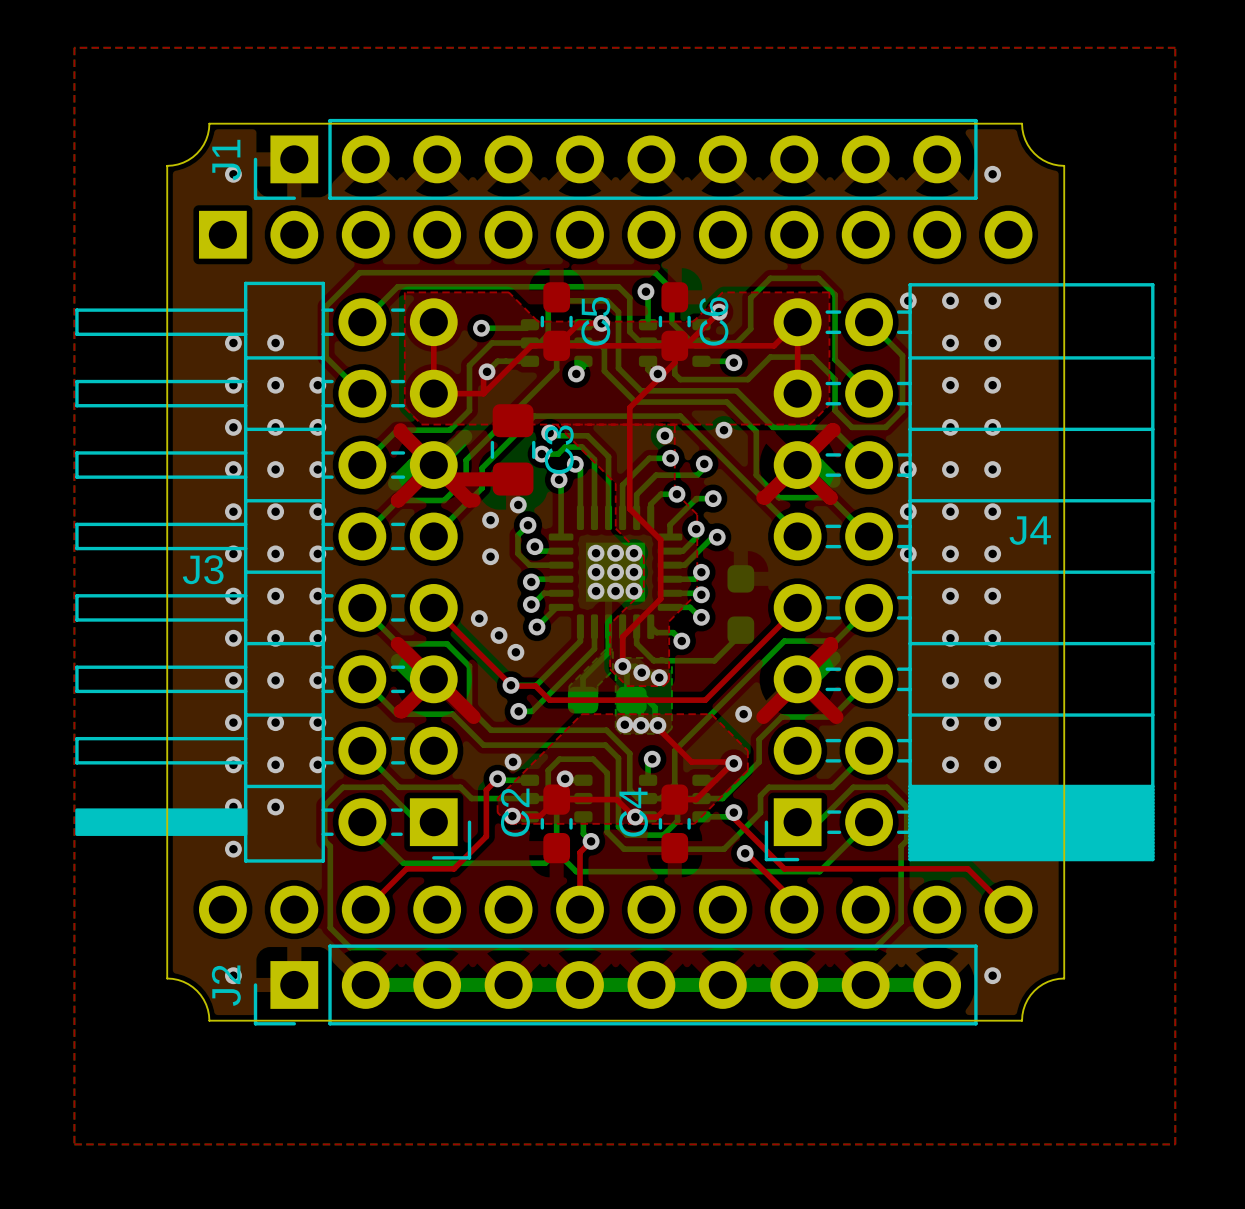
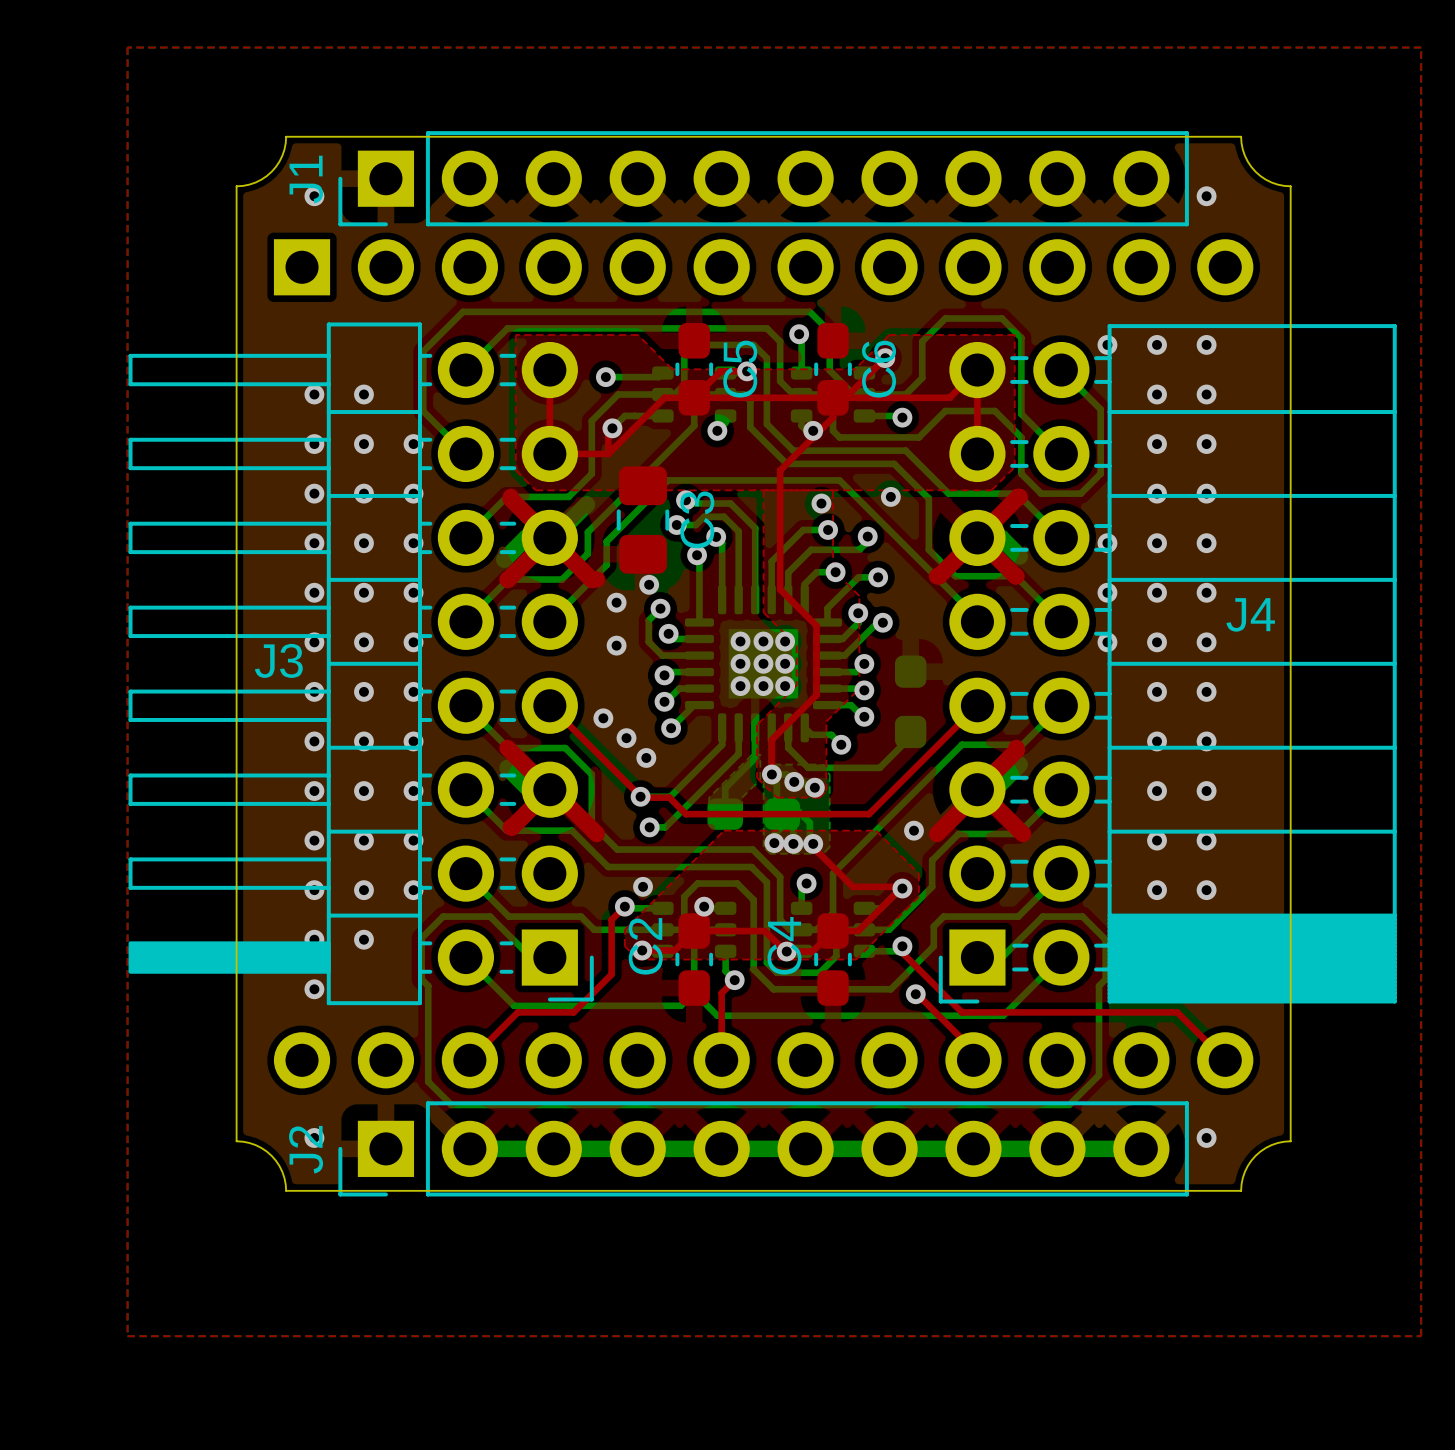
top zone outline: (556, 424) (615, 483) -> (763, 490) (763, 559)
top track: (448, 479) (512, 479) -> none

